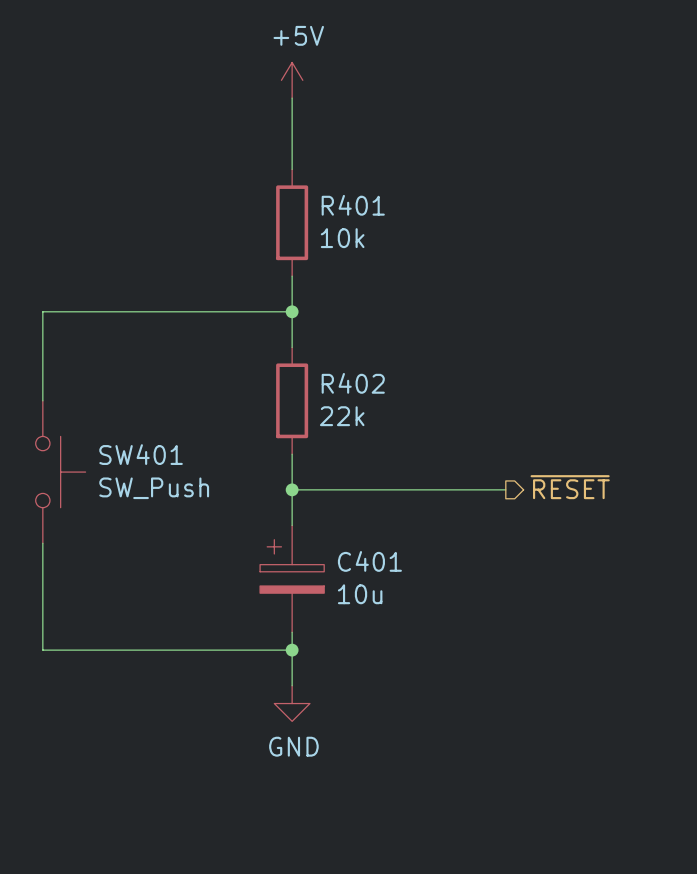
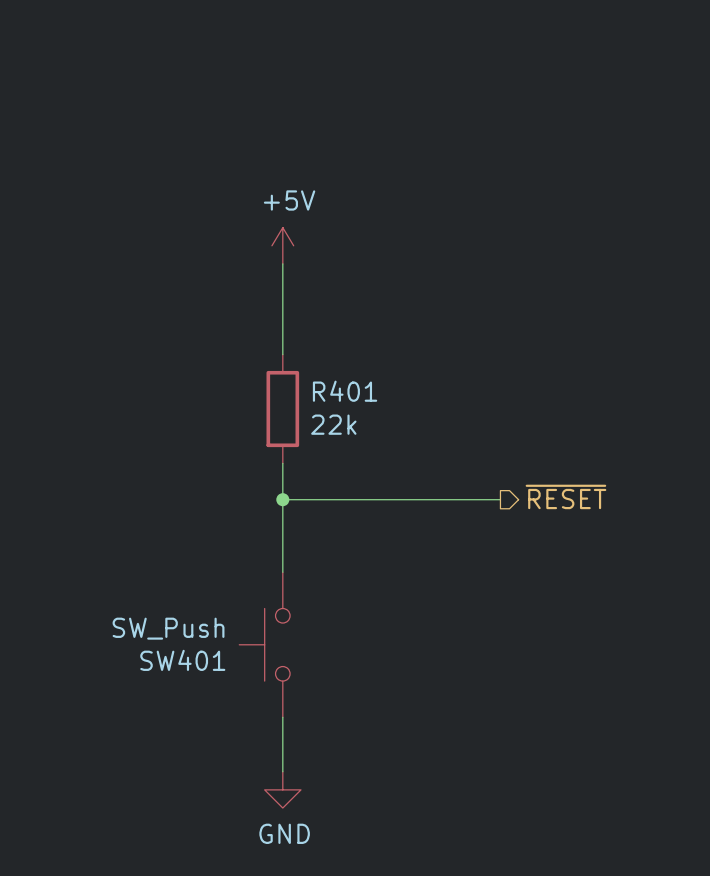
power symbol position: +5V (292, 80) -> +5V (282, 245)
wire: (292, 98) (292, 169) -> none
R401: 10k (292, 222) -> none
wire: (292, 311) (42, 311) (42, 400) -> none
junction: (292, 311) -> none
R402 name: R402 (353, 383) -> R401 (345, 391)
SW401 rotation: 0° (60, 472) -> 180° (264, 644)
SW401 position: (60, 472) -> (264, 644)
wire: (42, 543) (42, 650) (292, 650) -> none
C401: 10u (292, 578) -> none
wire: (292, 632) (292, 685) -> (282, 717) (282, 771)
junction: (292, 650) -> none
power symbol position: GND (292, 703) -> GND (282, 789)

